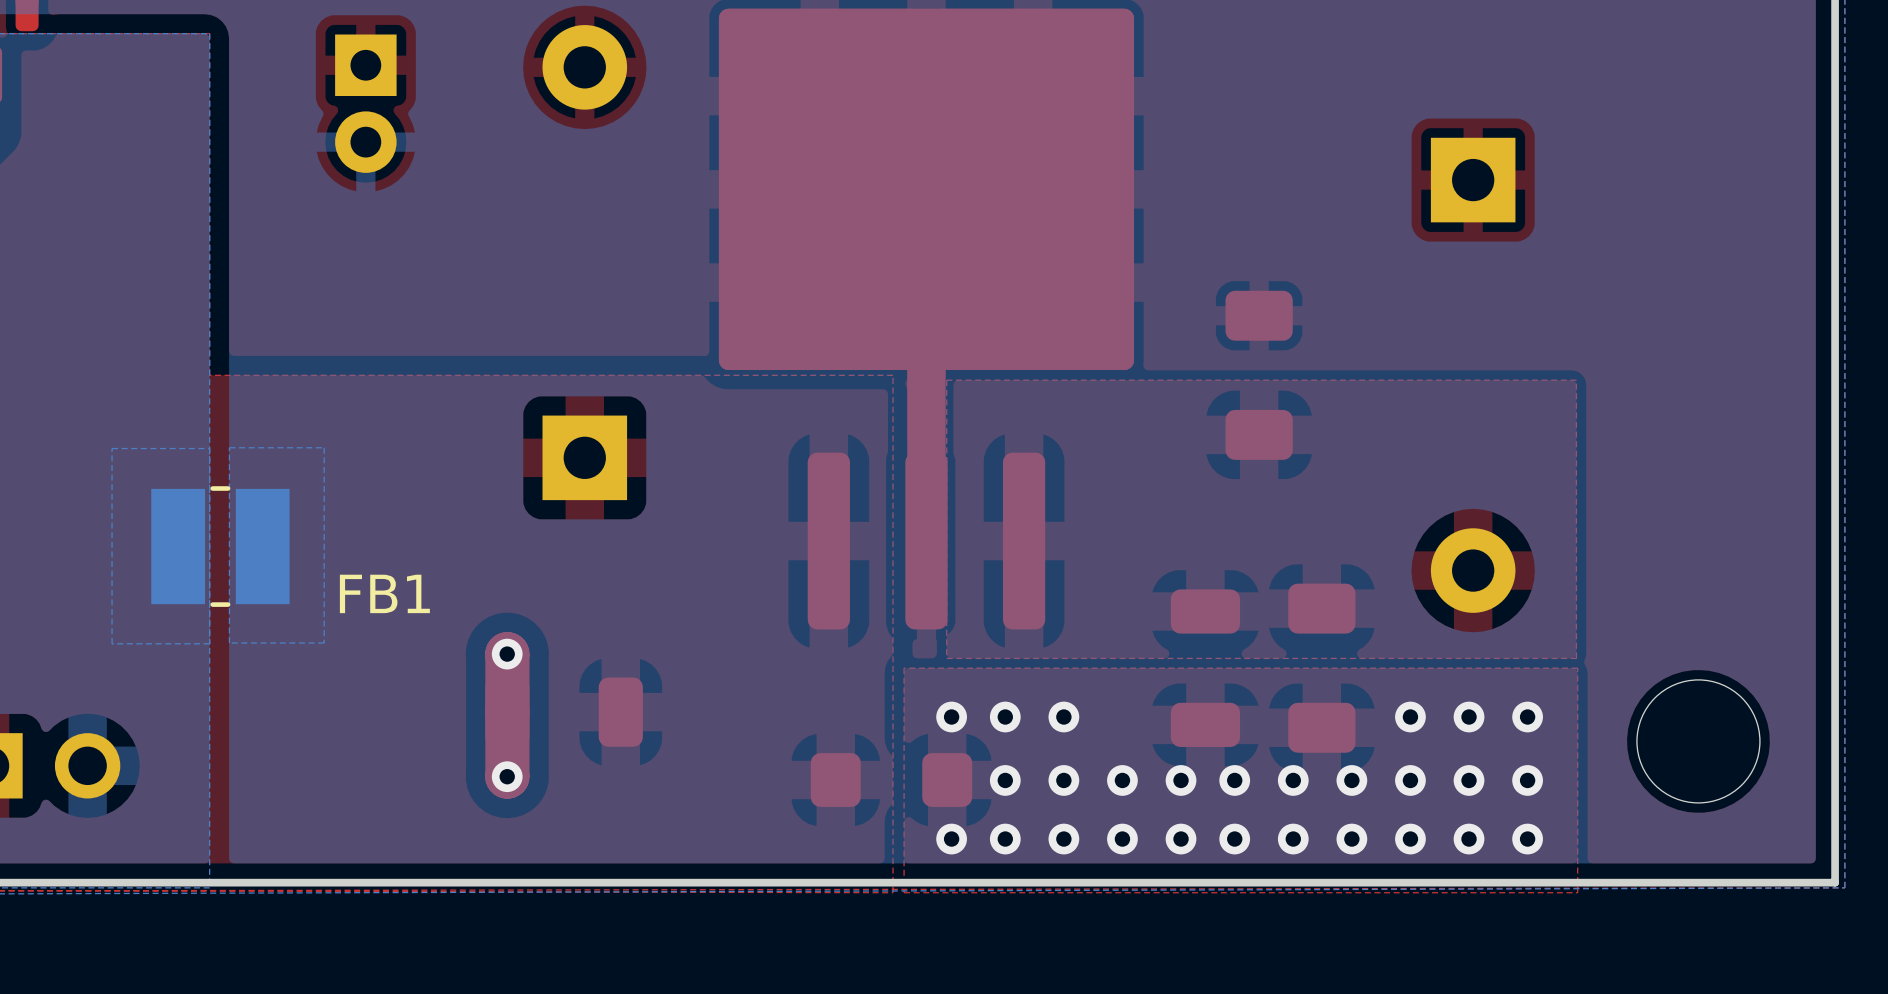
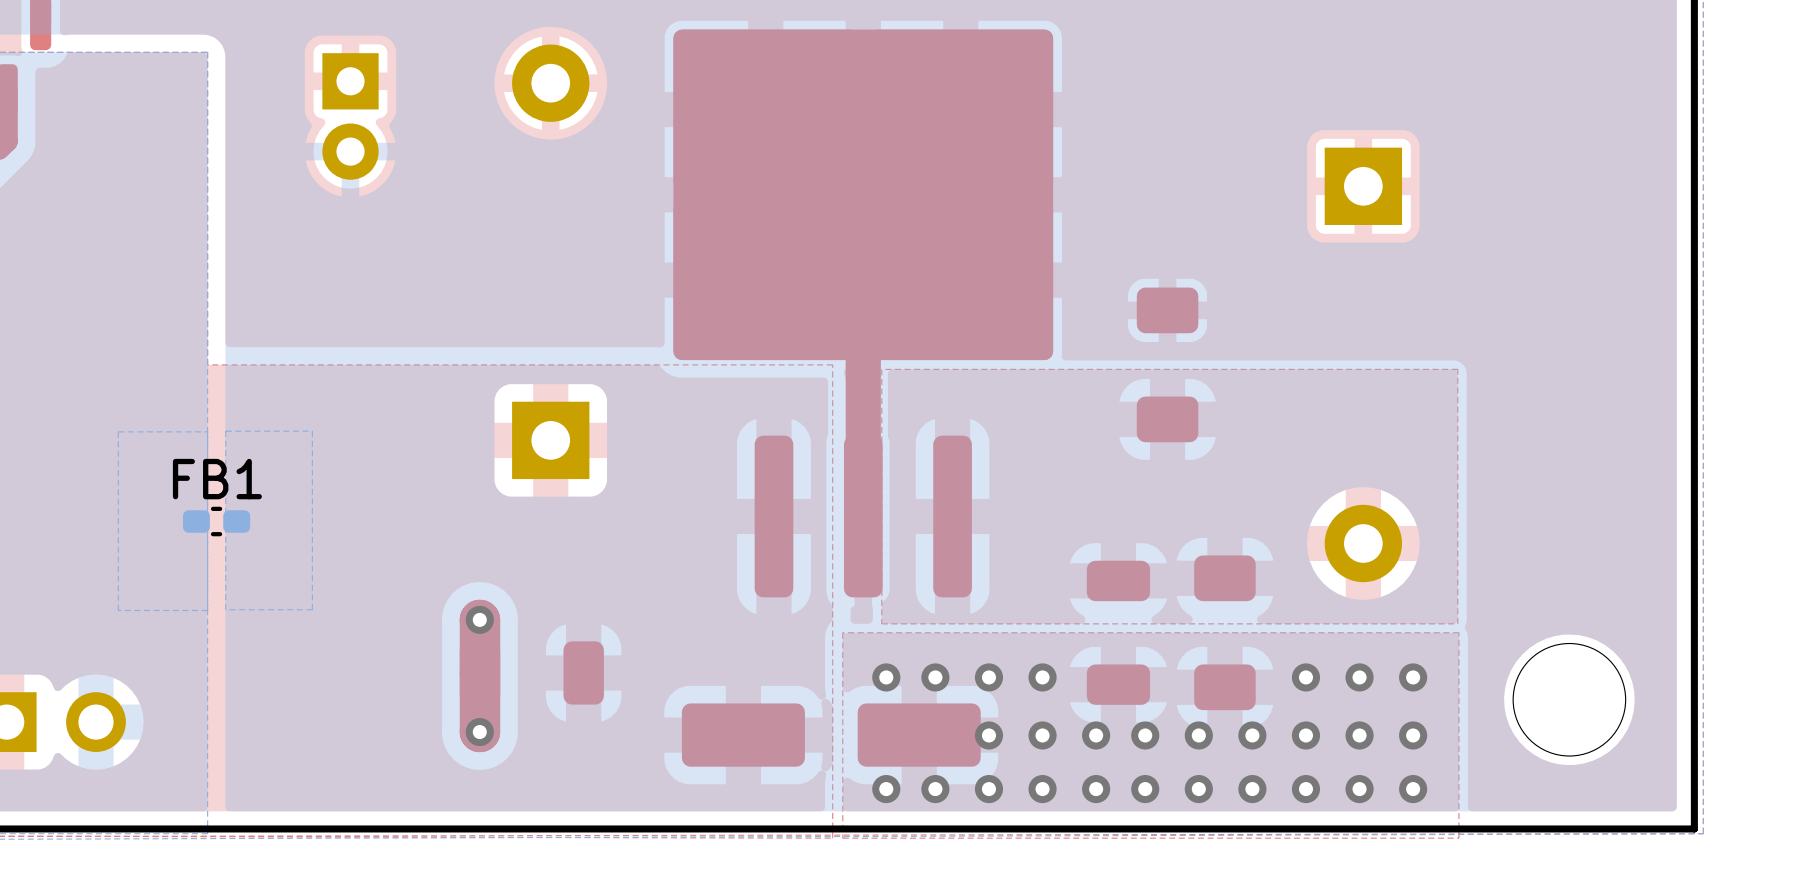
FB1 footprint: [151, 486, 290, 607] -> [182, 506, 251, 537]
FB1 name position: FB1 (384, 593) -> FB1 (217, 479)
part footprint: [810, 753, 973, 807] -> [681, 703, 981, 767]
via position: (1005, 780) -> (1042, 677)

